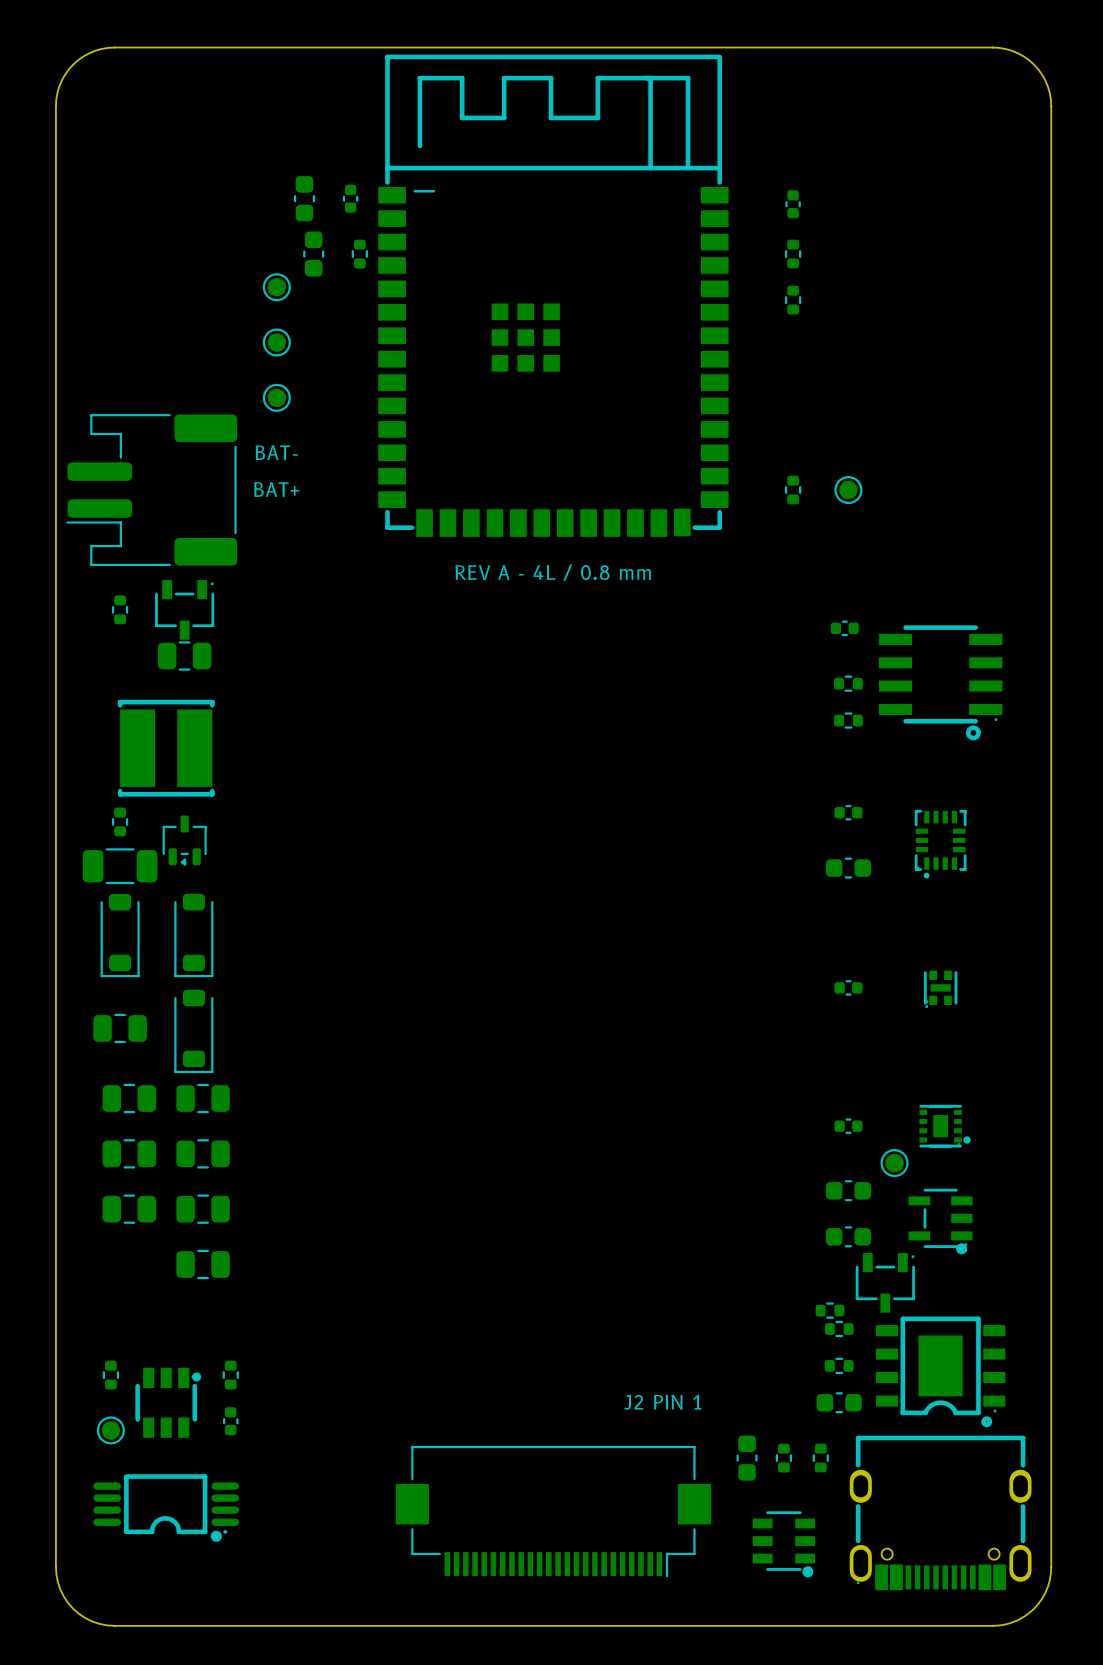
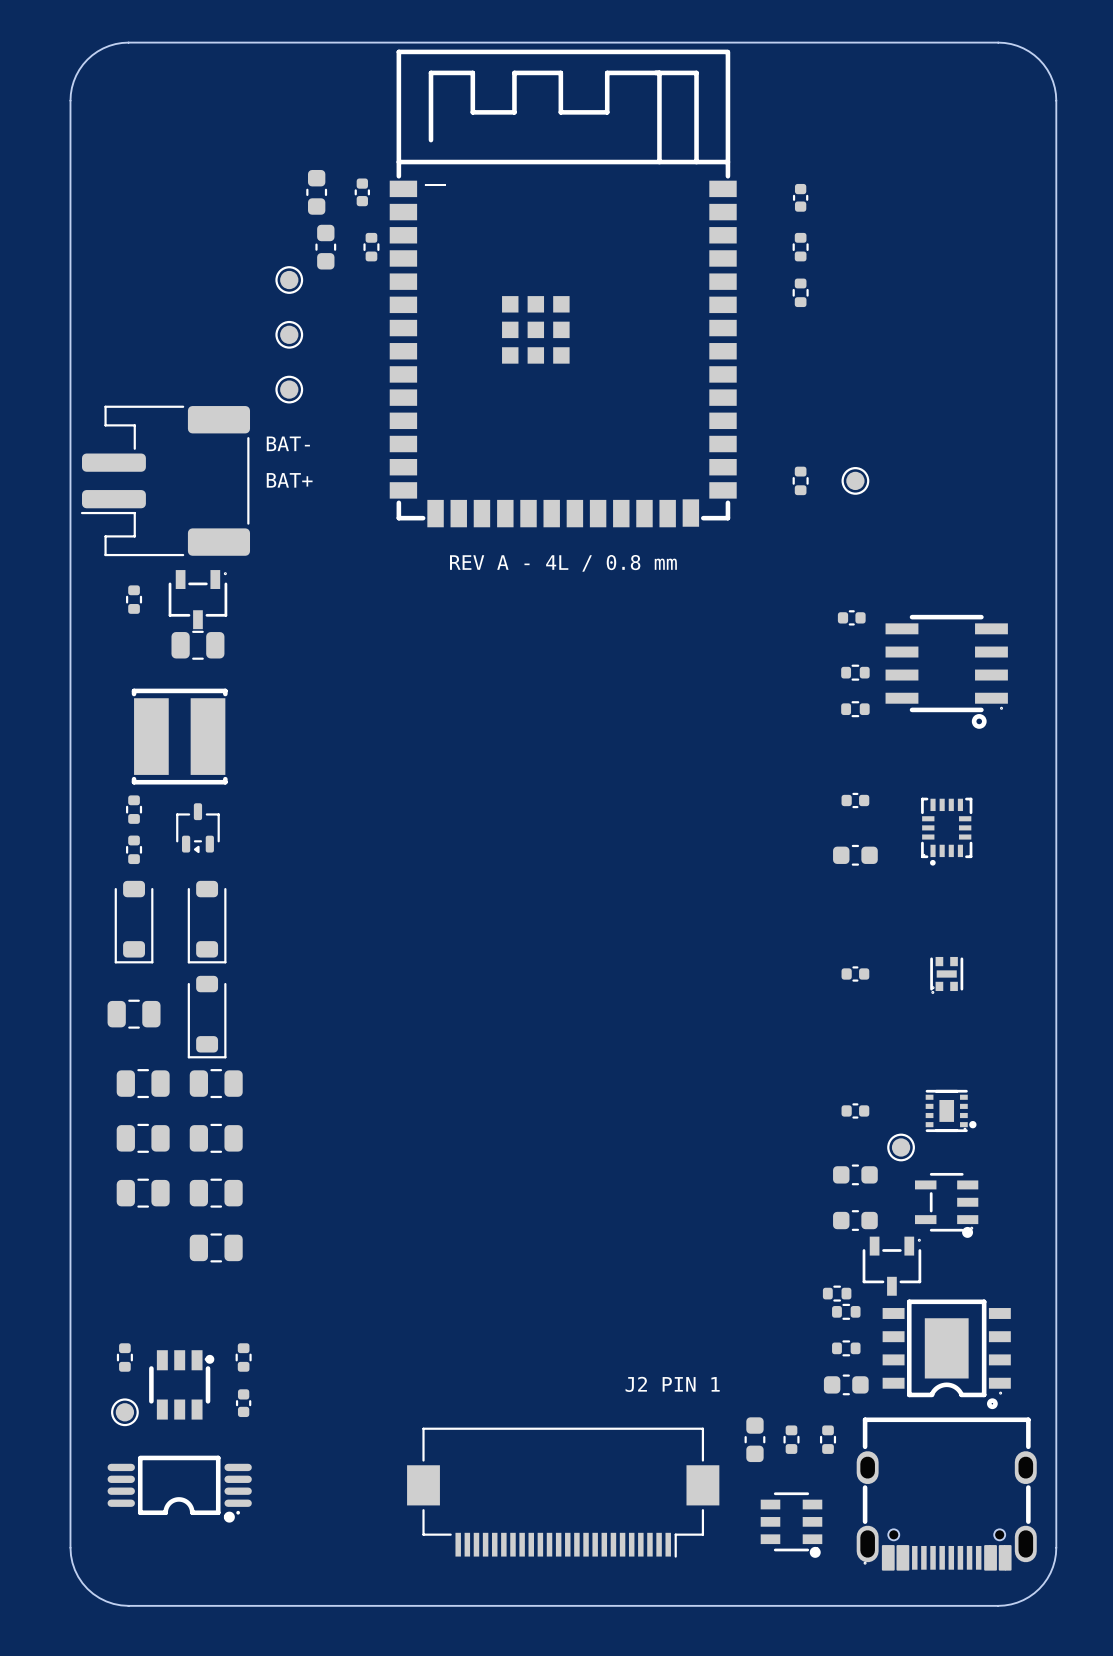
part footprint: [82, 848, 158, 885] -> [126, 835, 143, 865]

